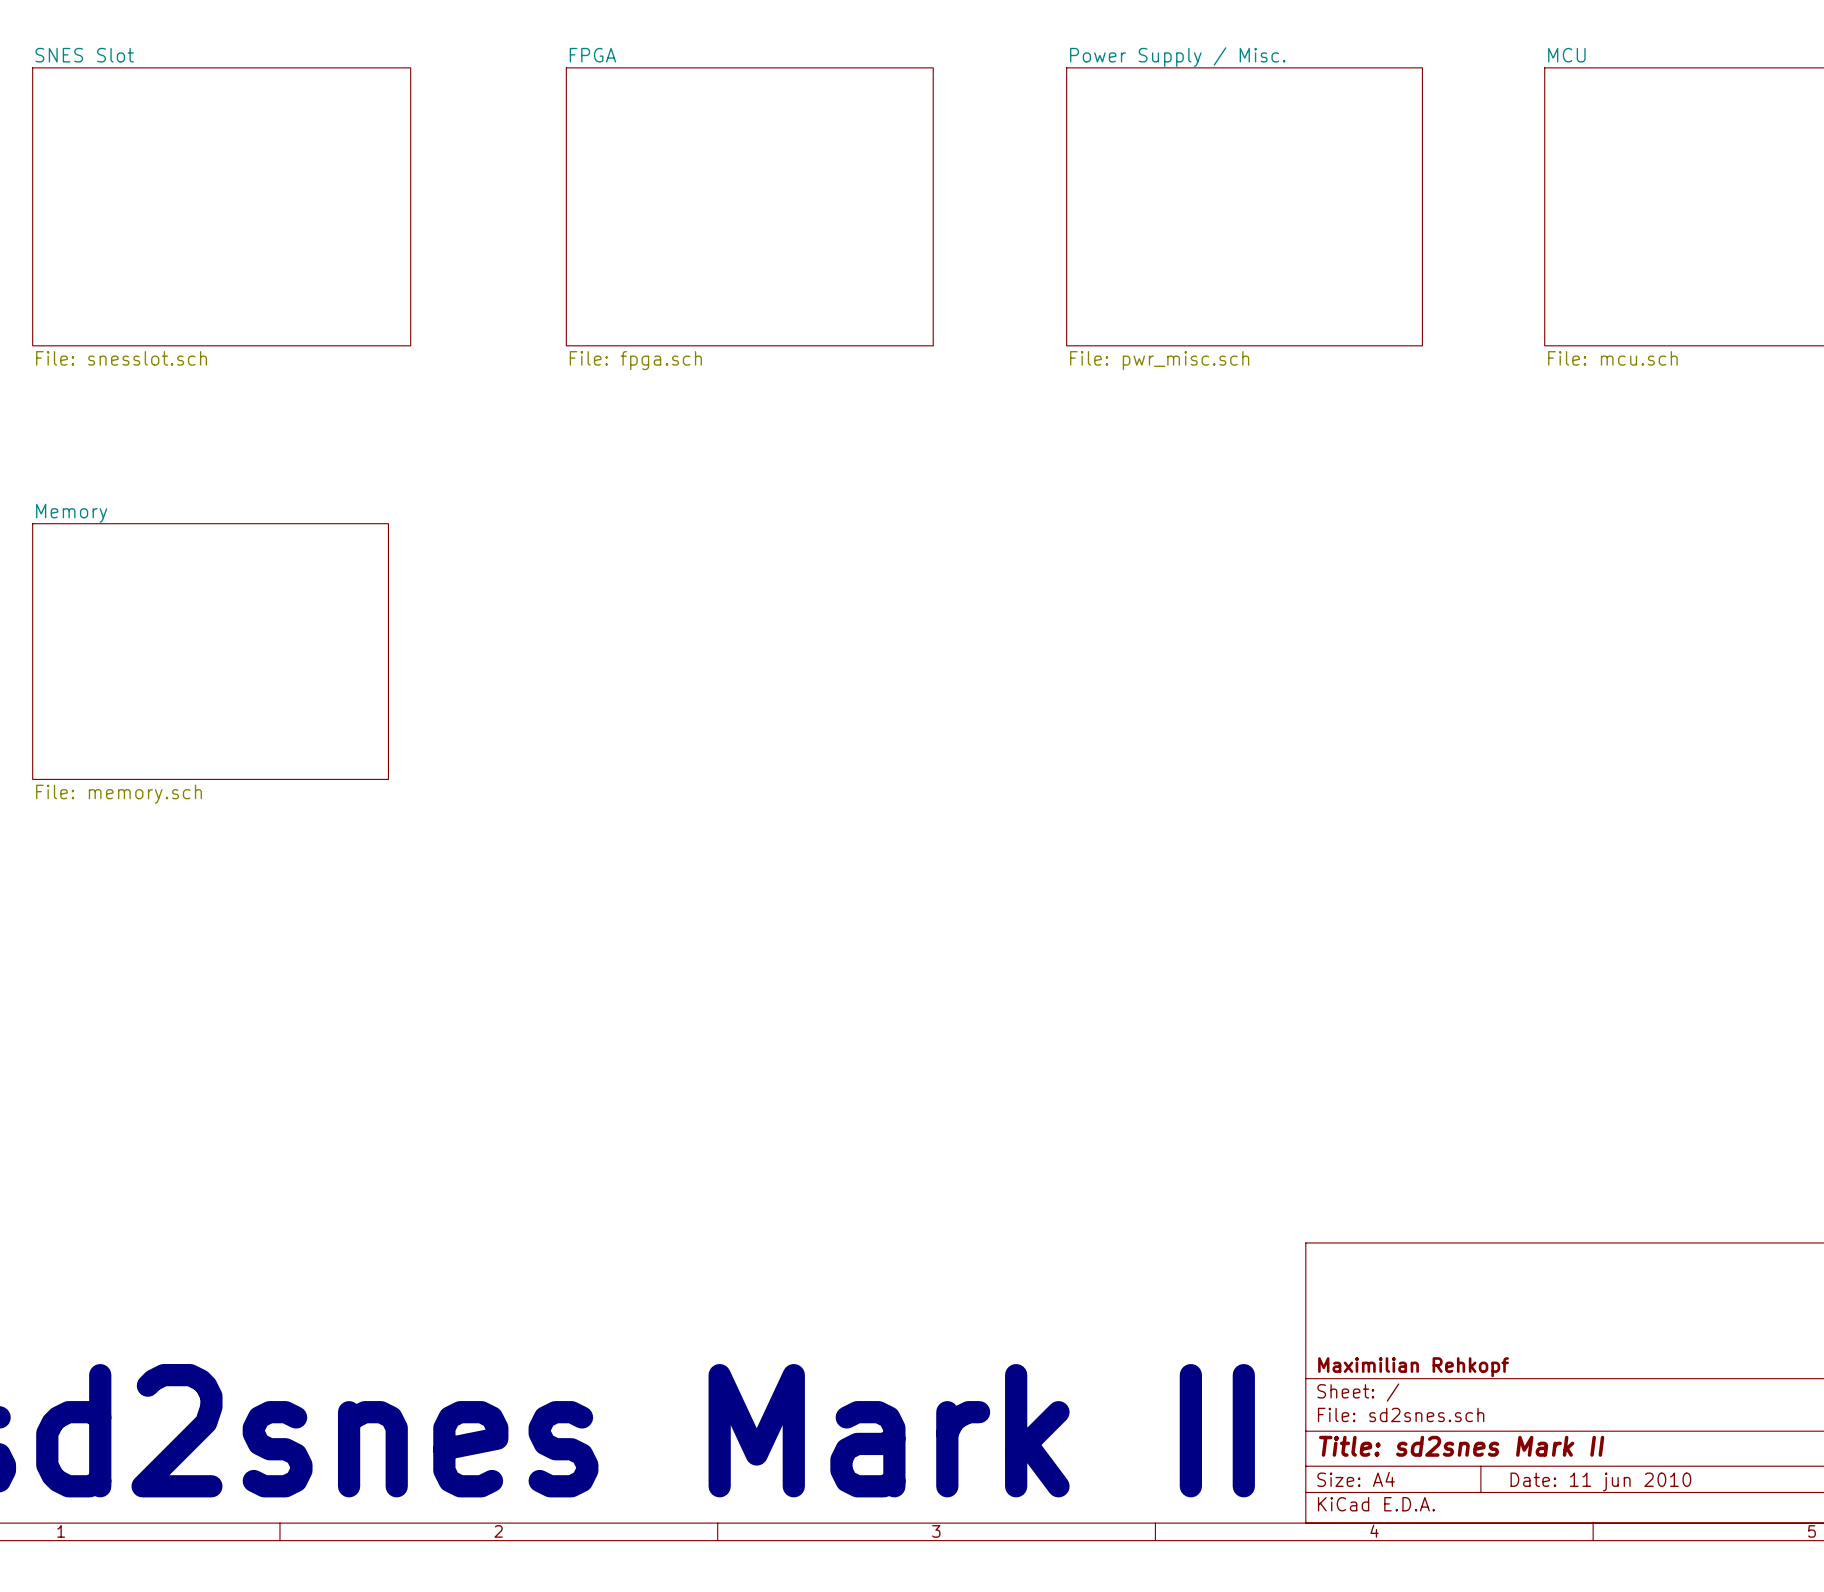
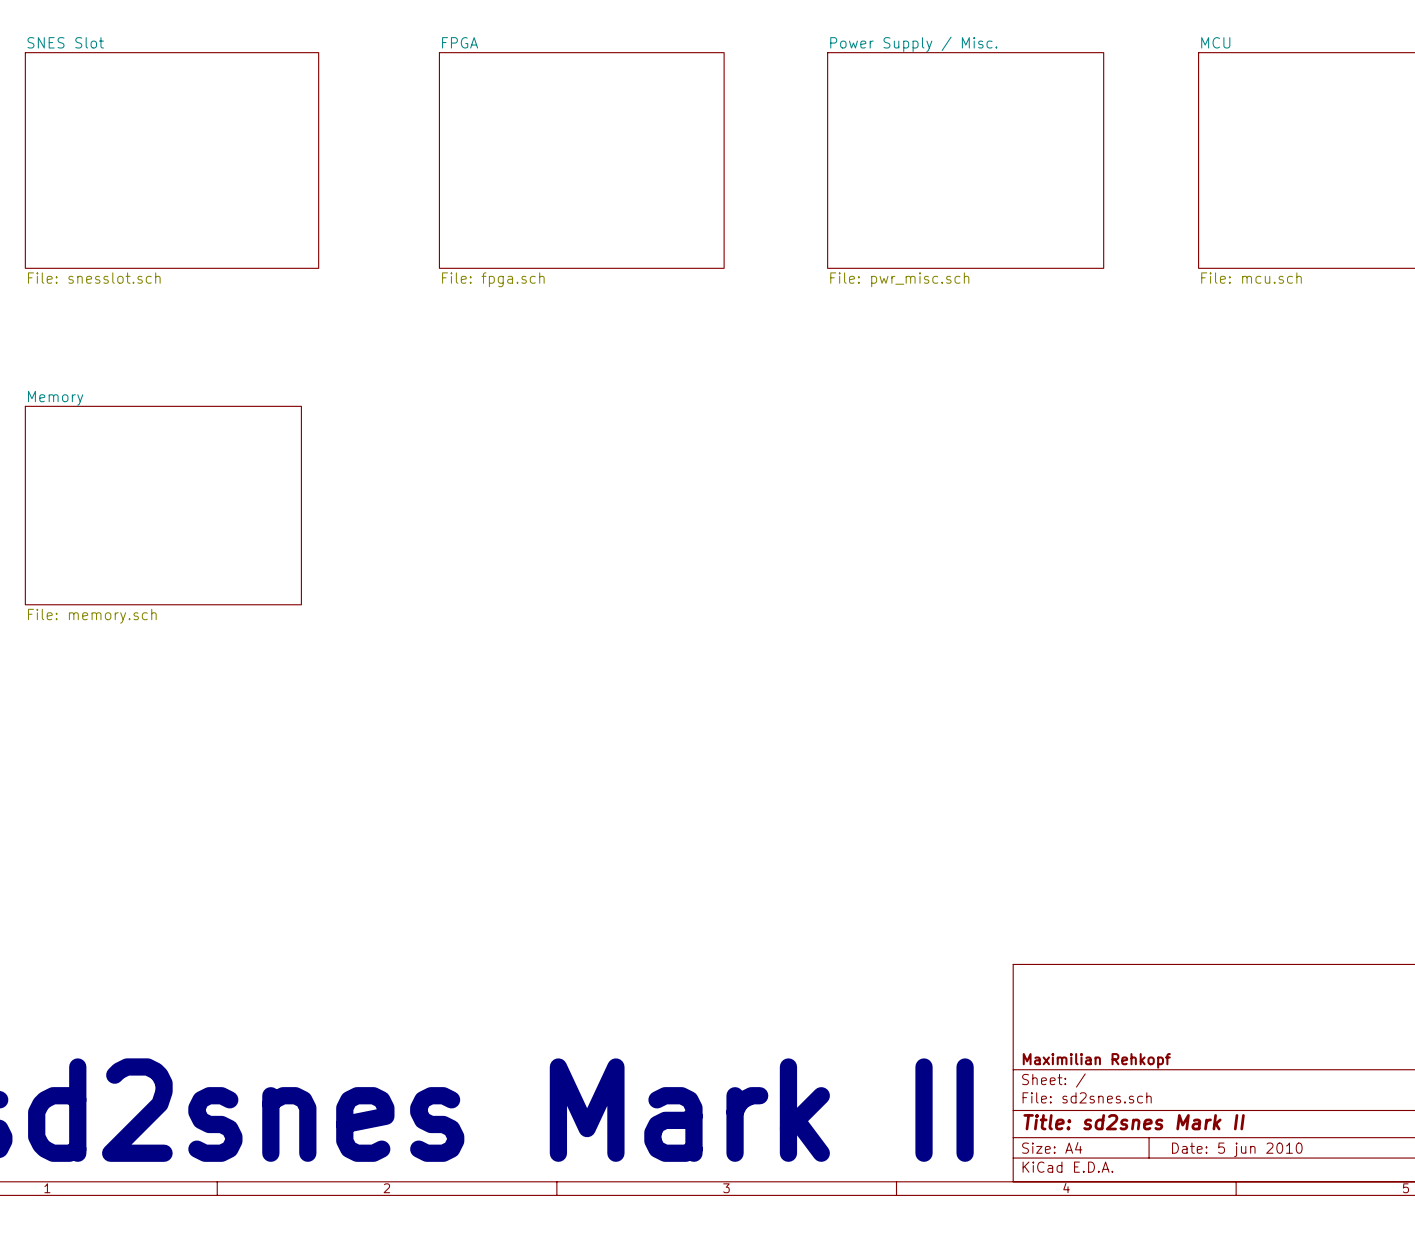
title block: Date: 11 jun 2010 (1600, 1481) -> Date: 5 jun 2010 (1237, 1149)

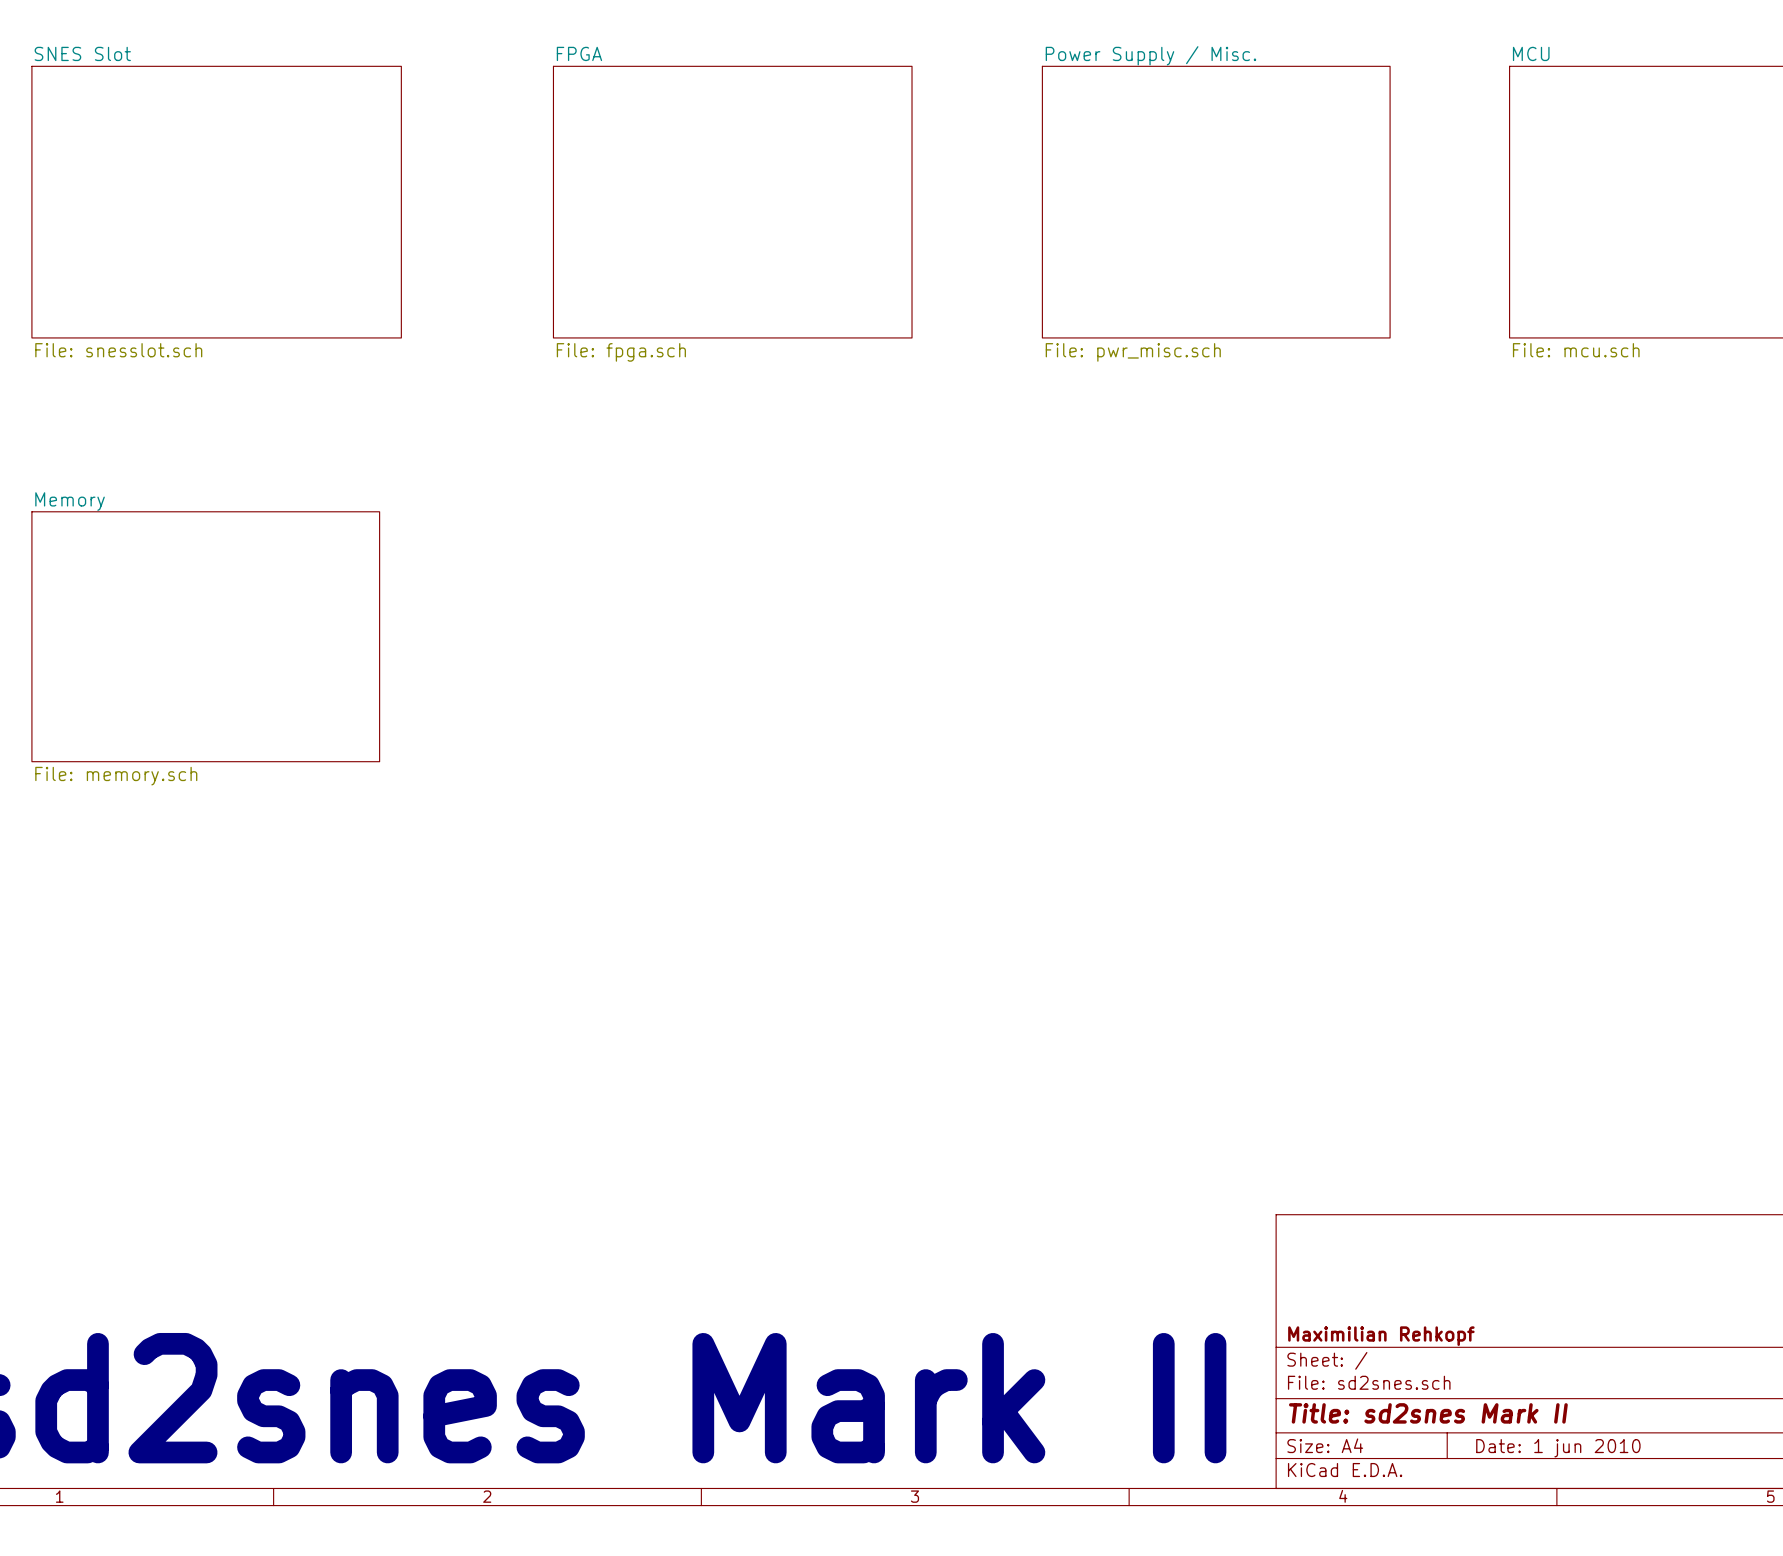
title block: Date: 5 jun 2010 (1237, 1149) -> Date: 1 jun 2010 (1558, 1448)

